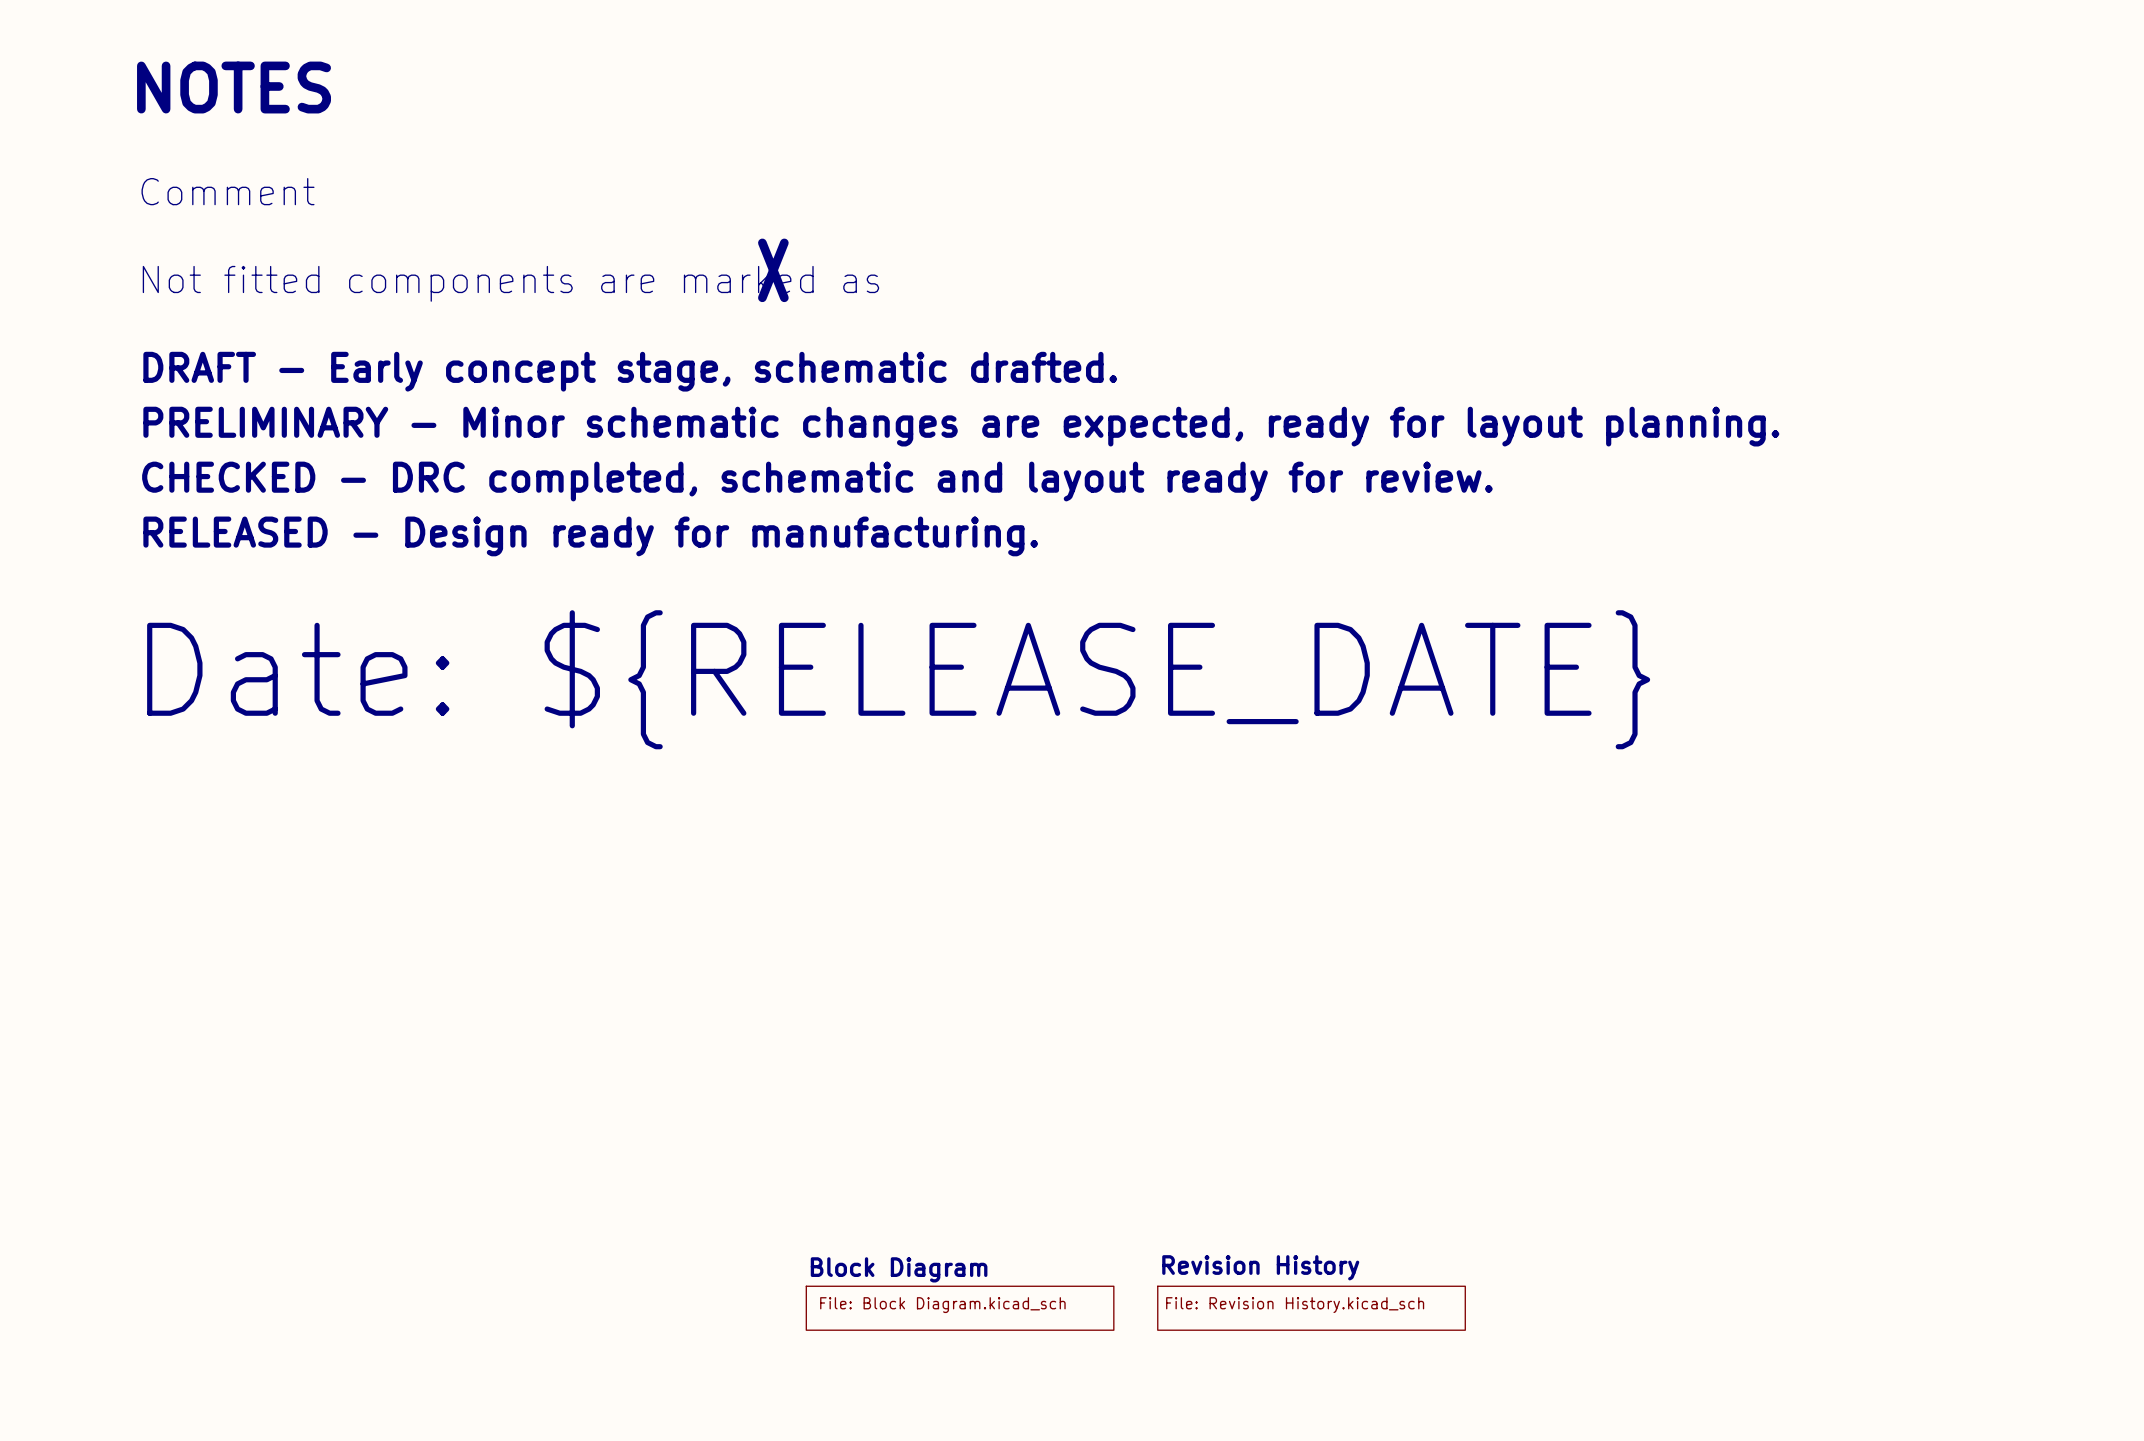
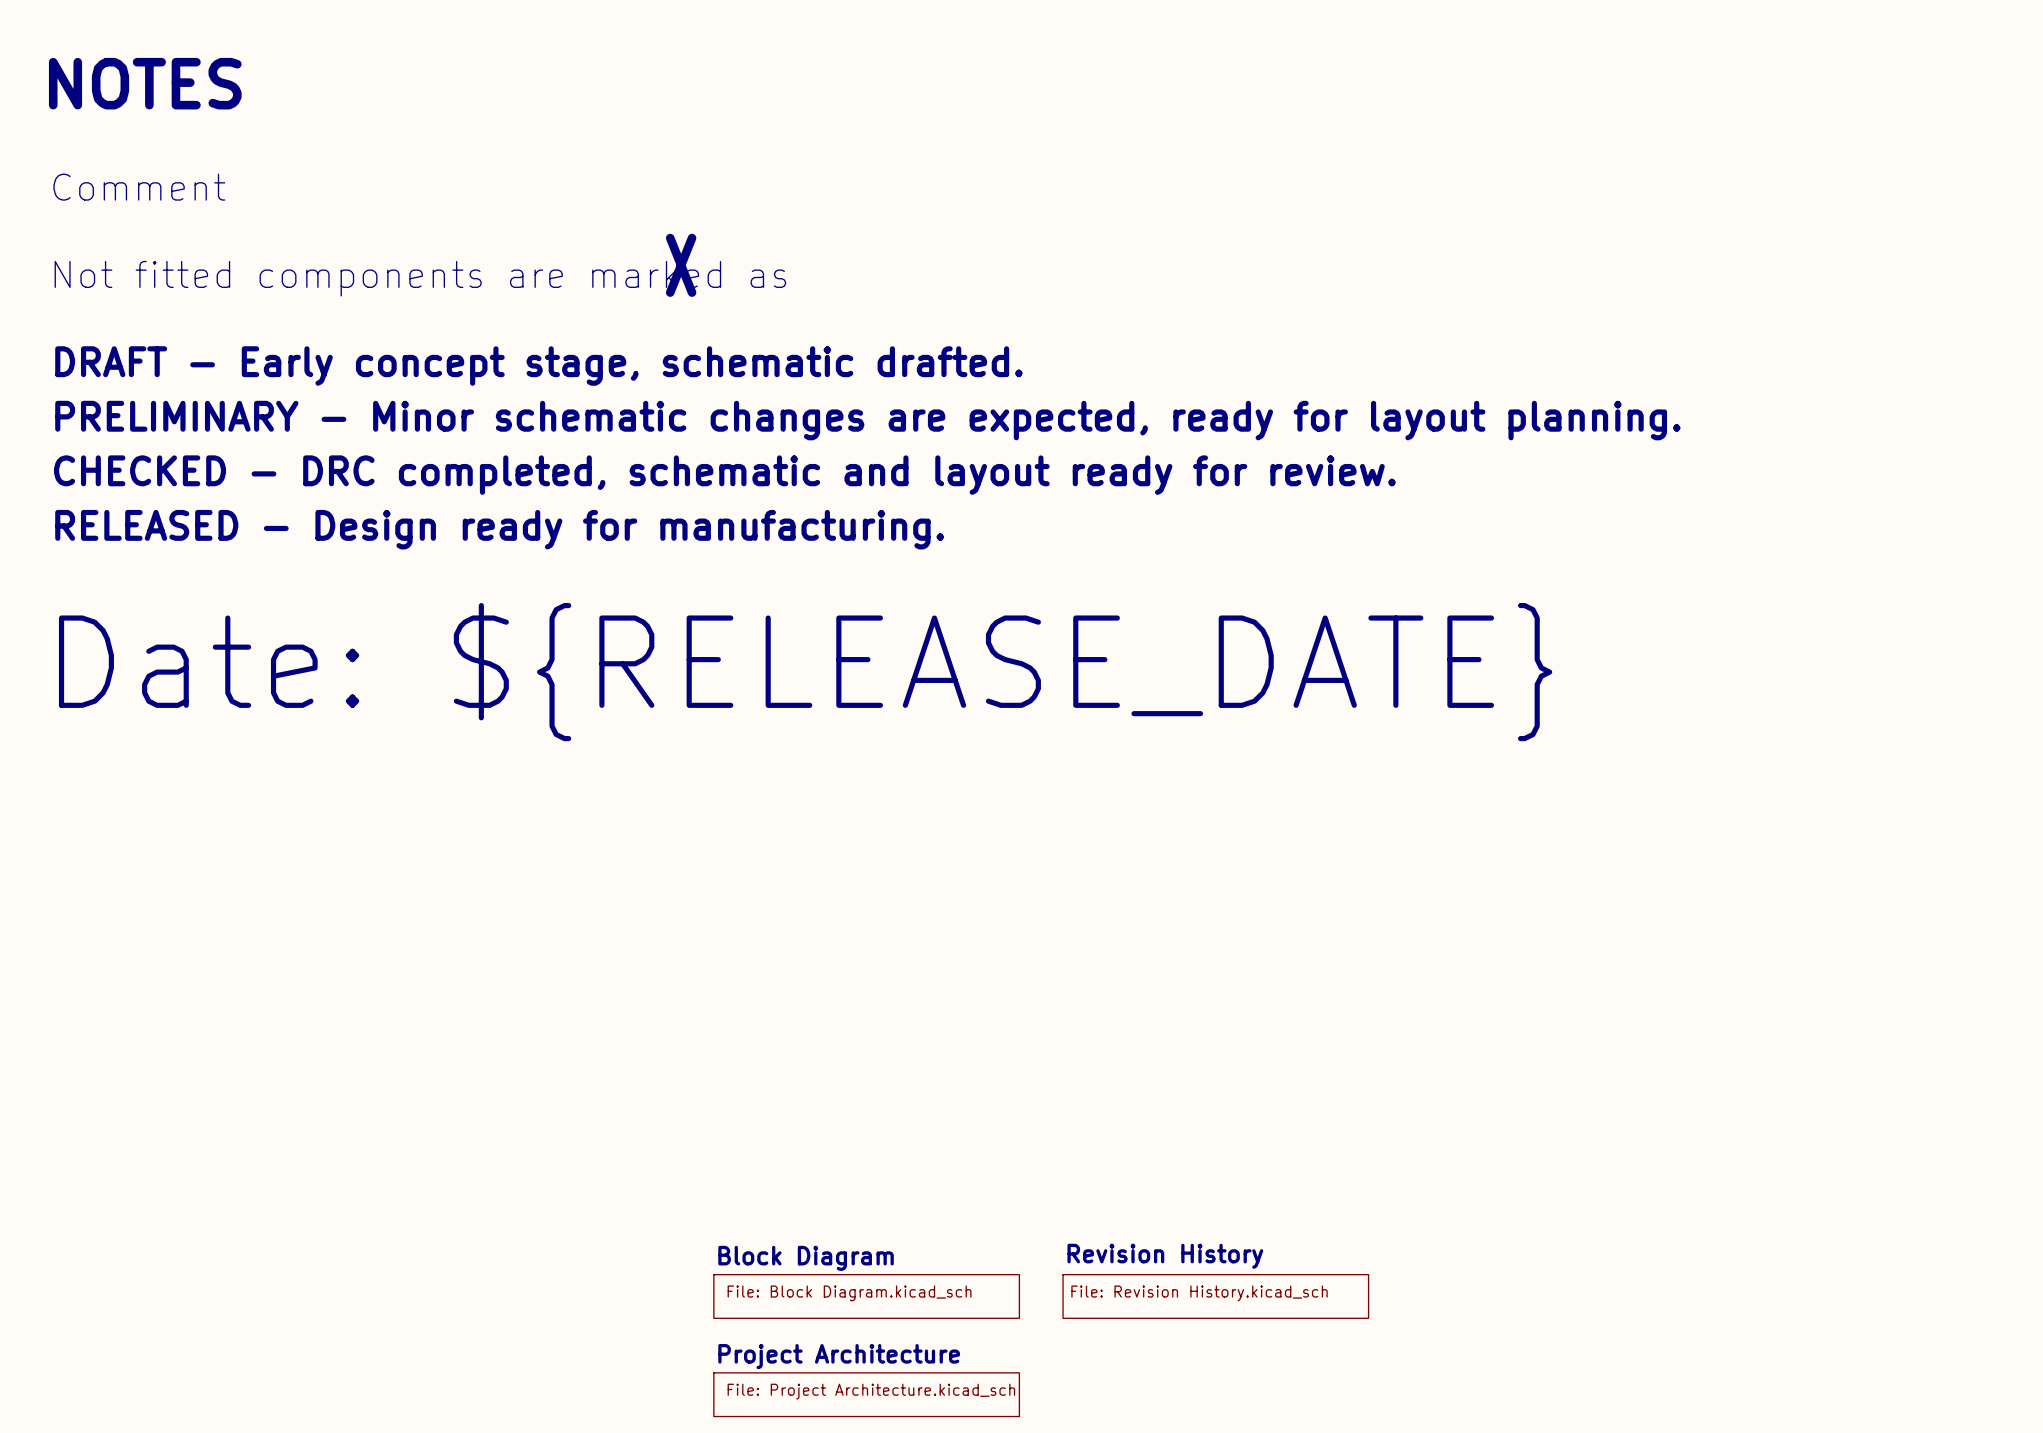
sheet Project Architecture: none -> File: Project Architecture.kicad_sch (866, 1394)

